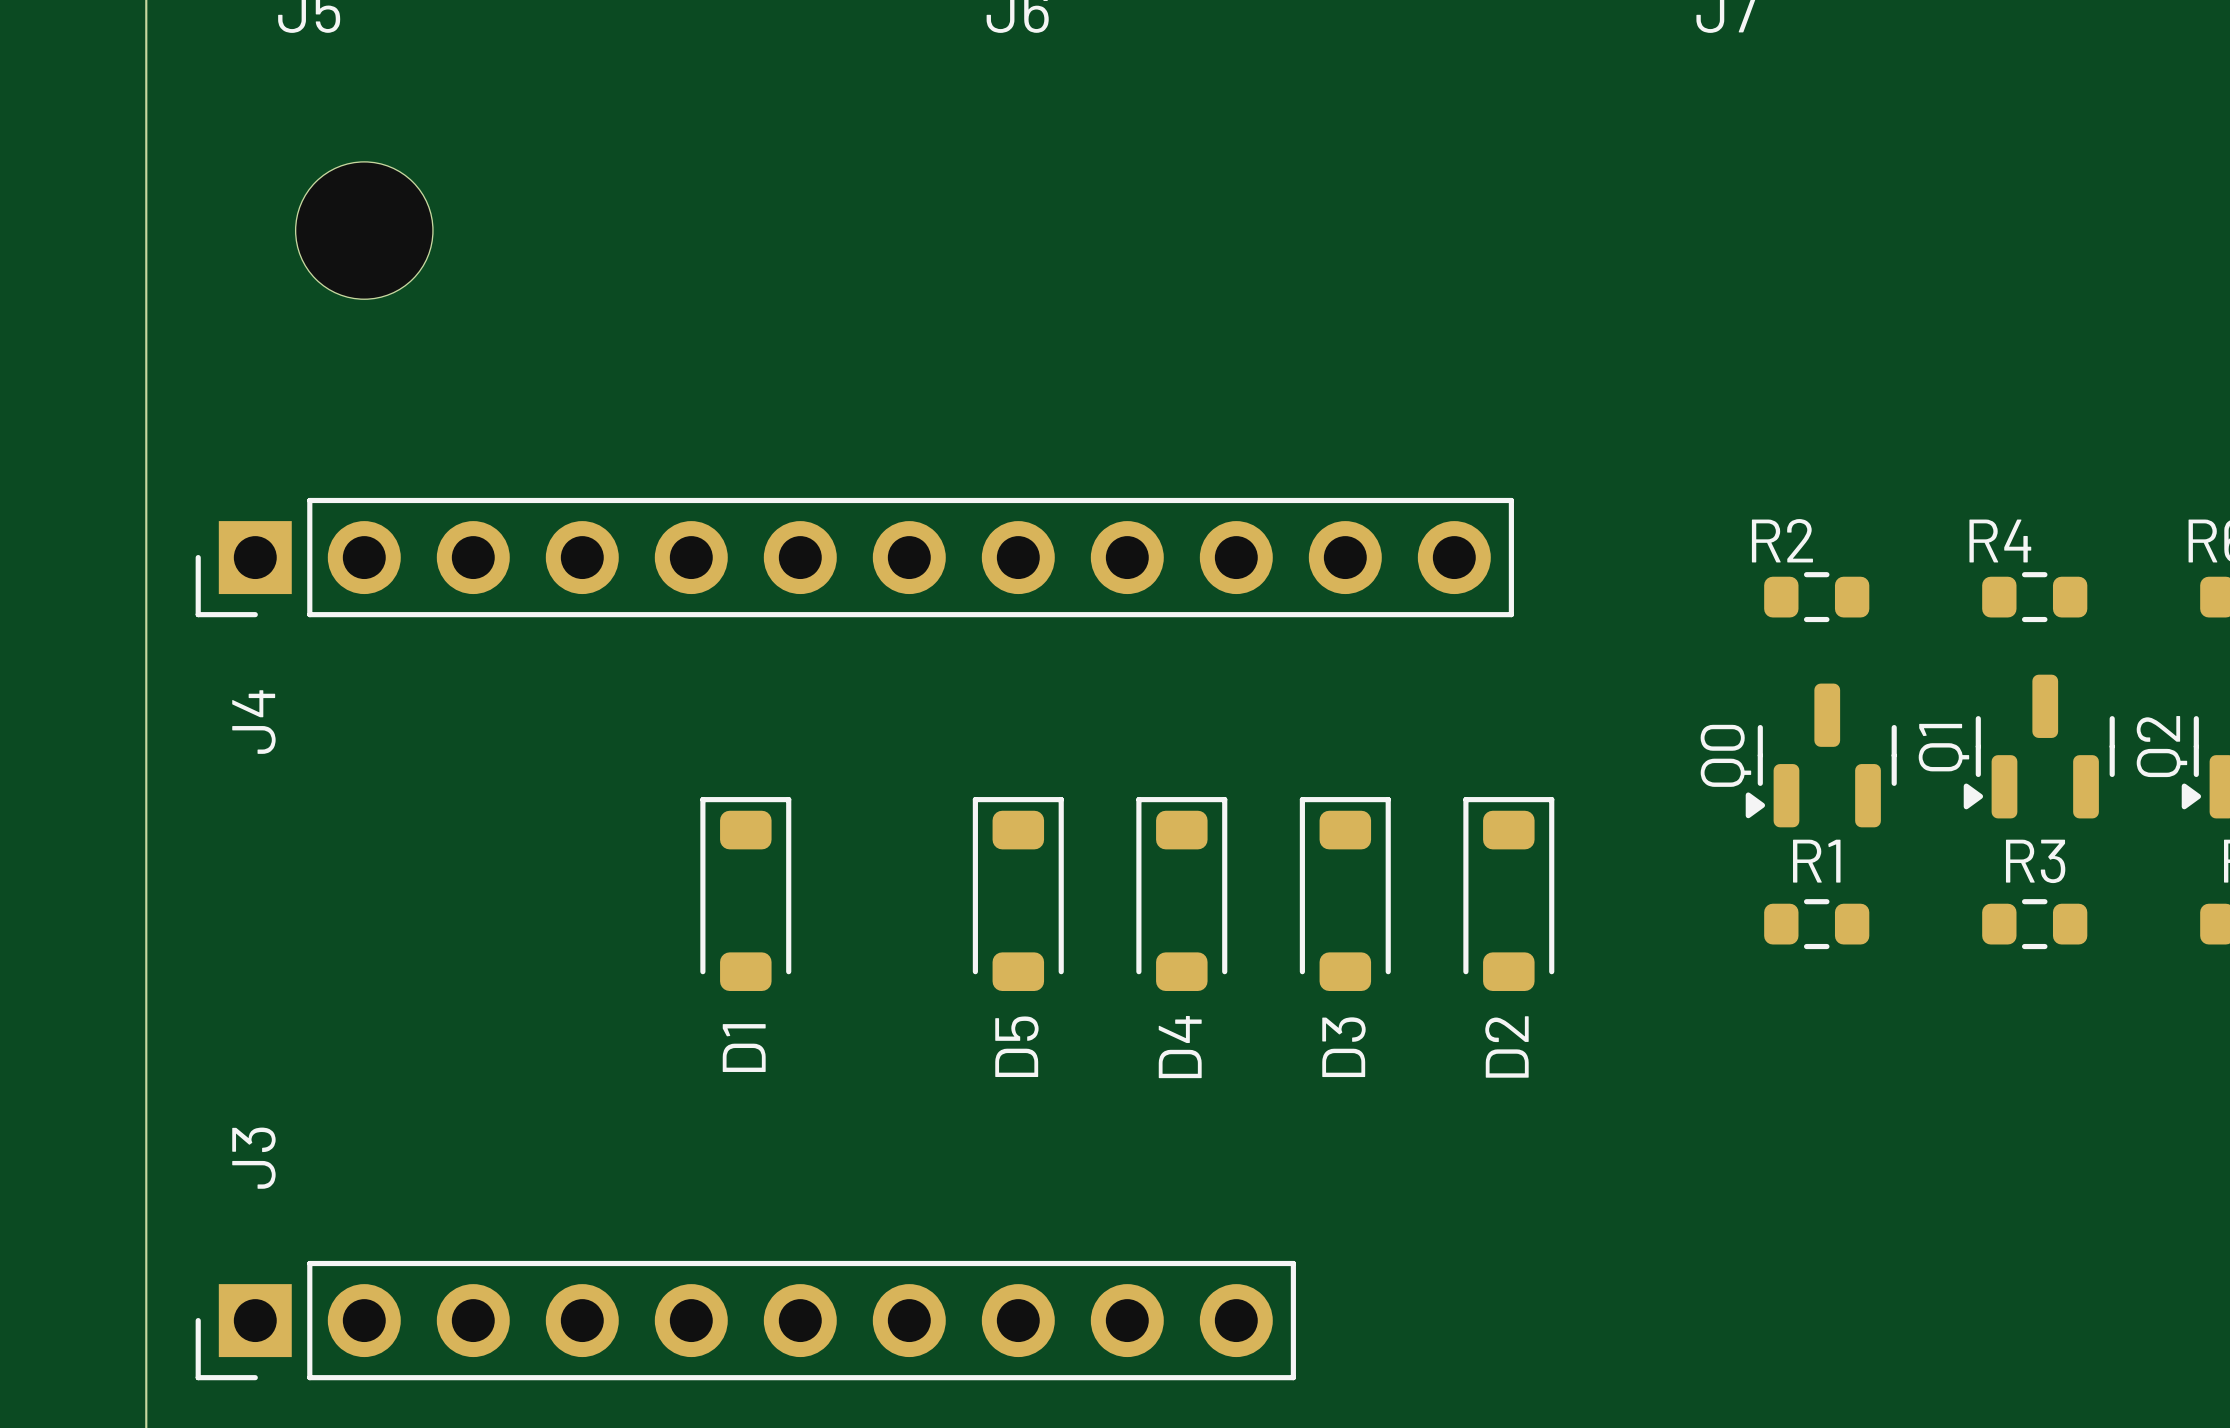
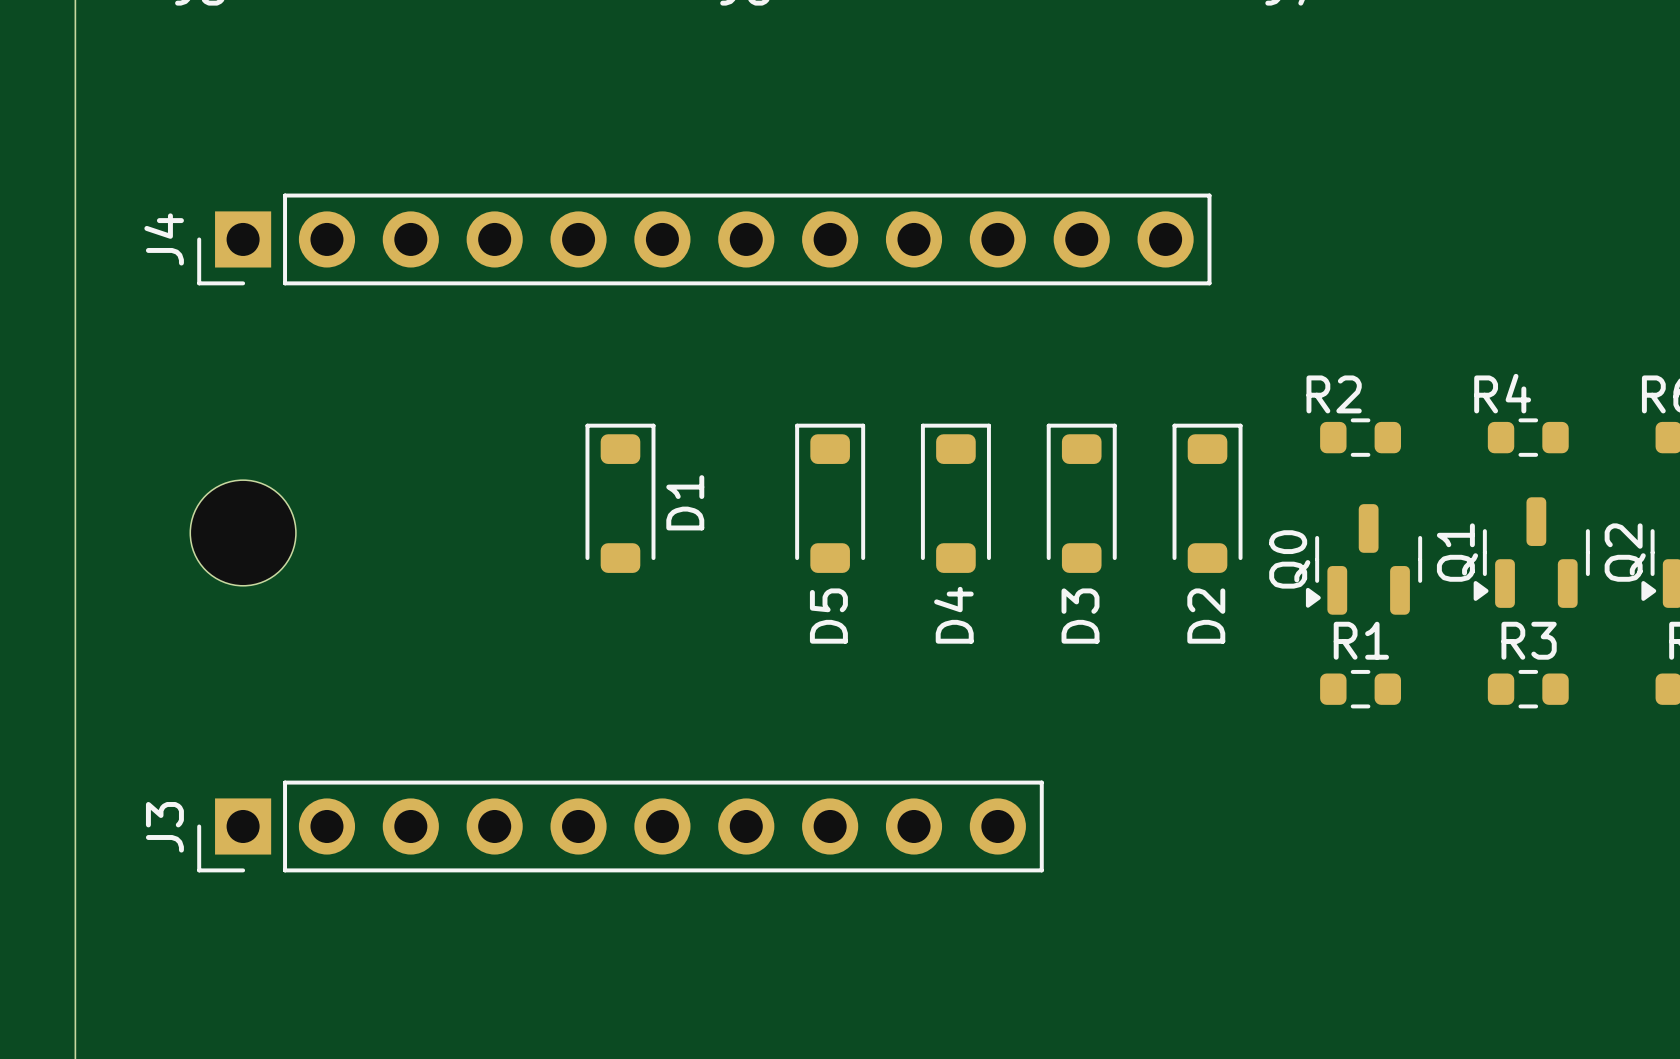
part position: (364, 230) -> (243, 532)
J4 position: (854, 557) -> (704, 239)
J4 name position: J4 (253, 722) -> J4 (164, 239)
D1 position: (745, 894) -> (620, 498)
D5 position: (1018, 894) -> (830, 498)
D4 position: (1181, 894) -> (955, 498)
D3 position: (1345, 894) -> (1081, 498)
D2 position: (1508, 894) -> (1207, 498)
D1 name position: D1 (744, 1048) -> D1 (685, 502)
J3 name position: J3 (253, 1158) -> J3 (164, 827)
J3 position: (745, 1320) -> (620, 826)

